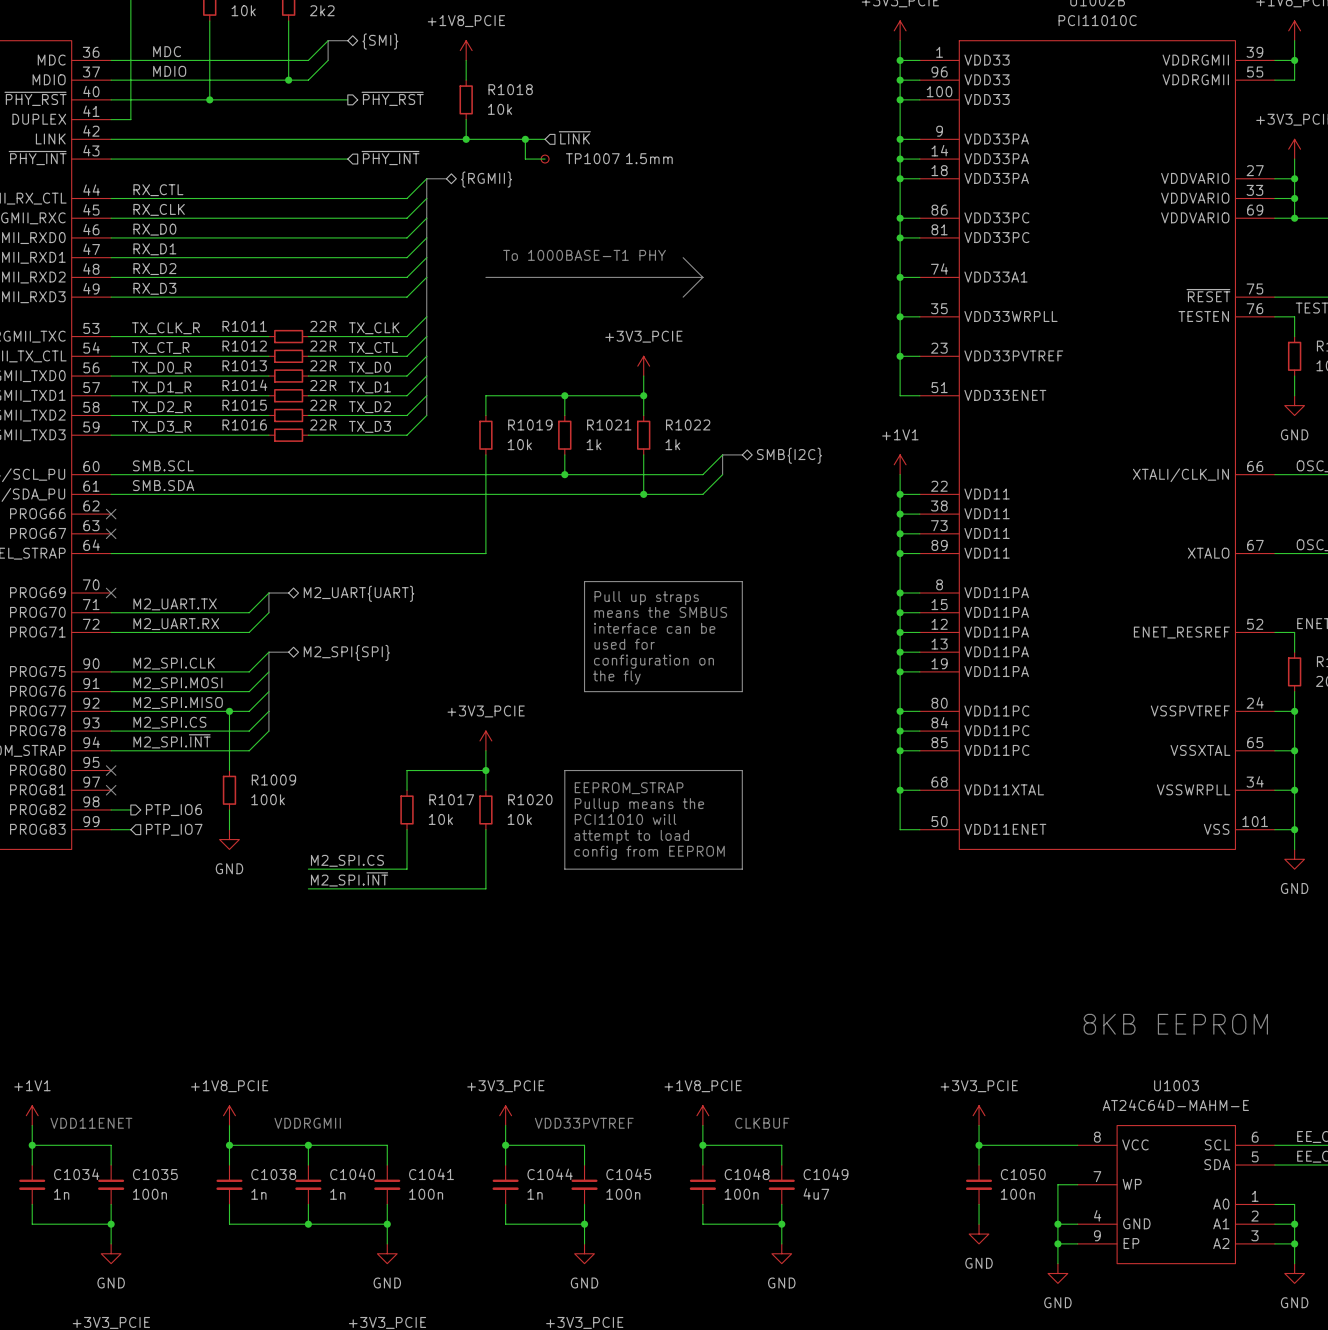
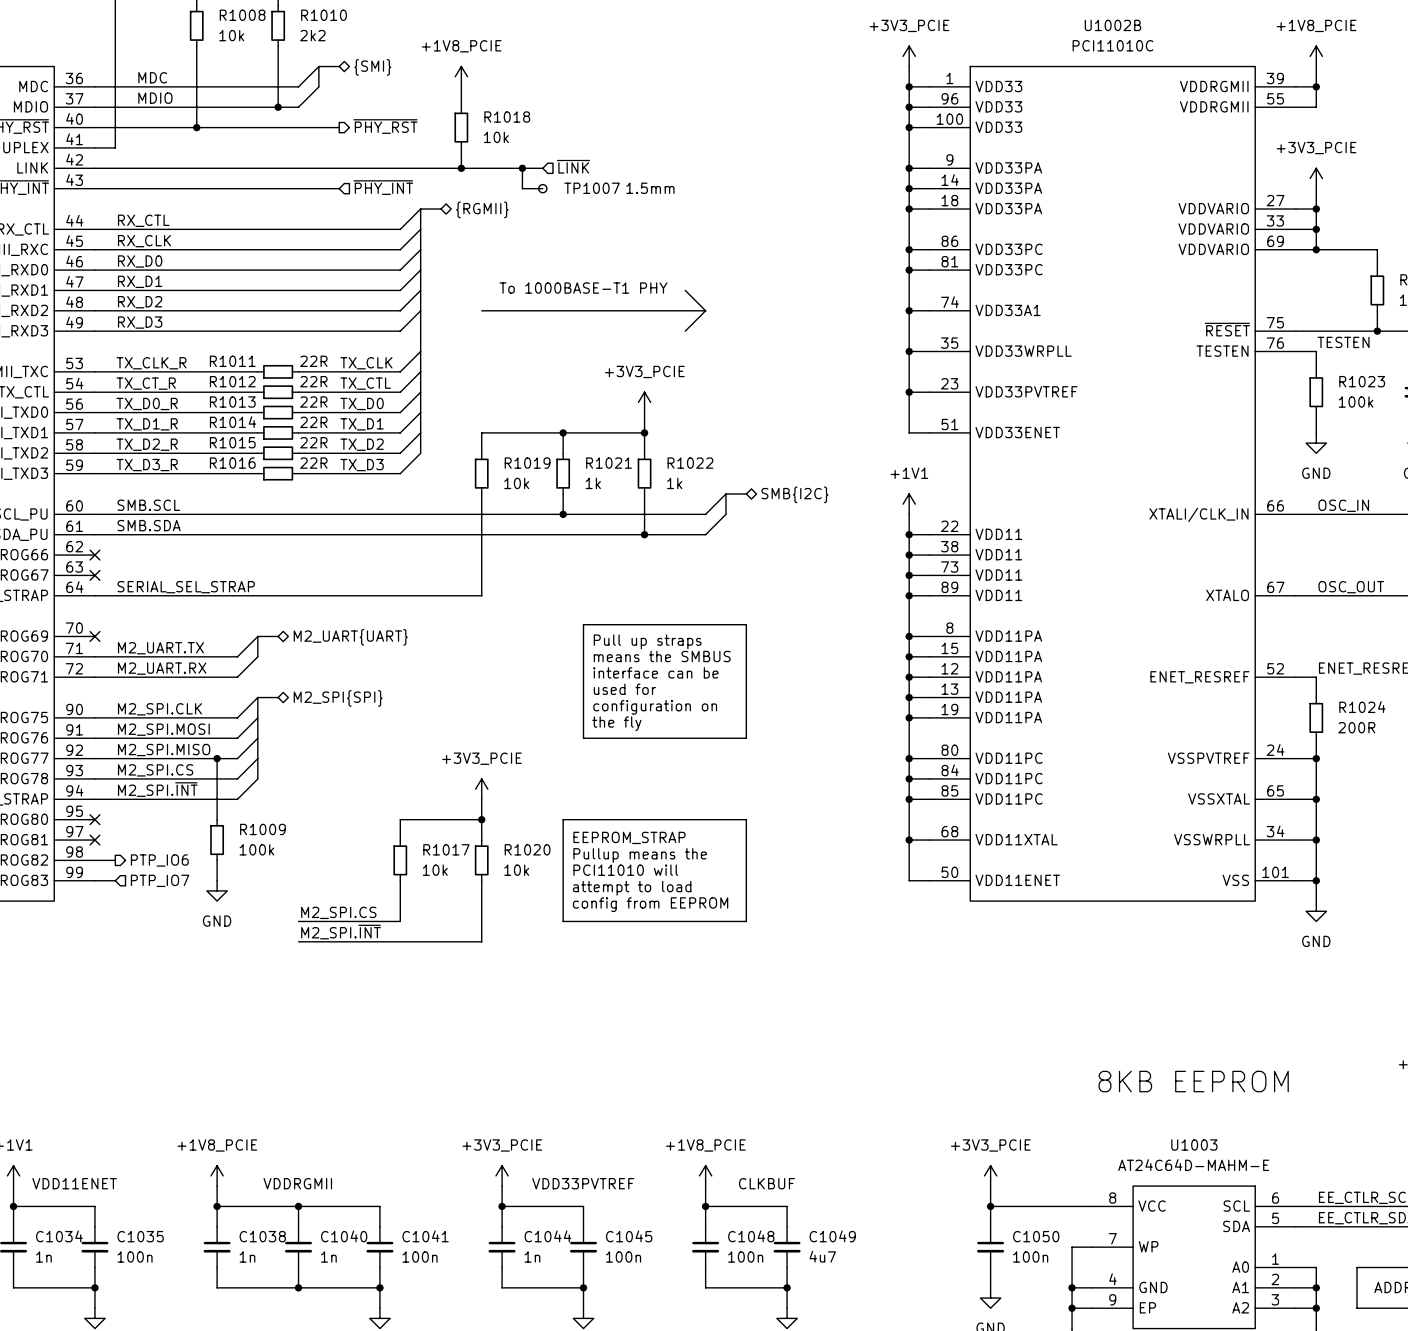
label: none -> SERIAL_SEL_STRAP (186, 587)

